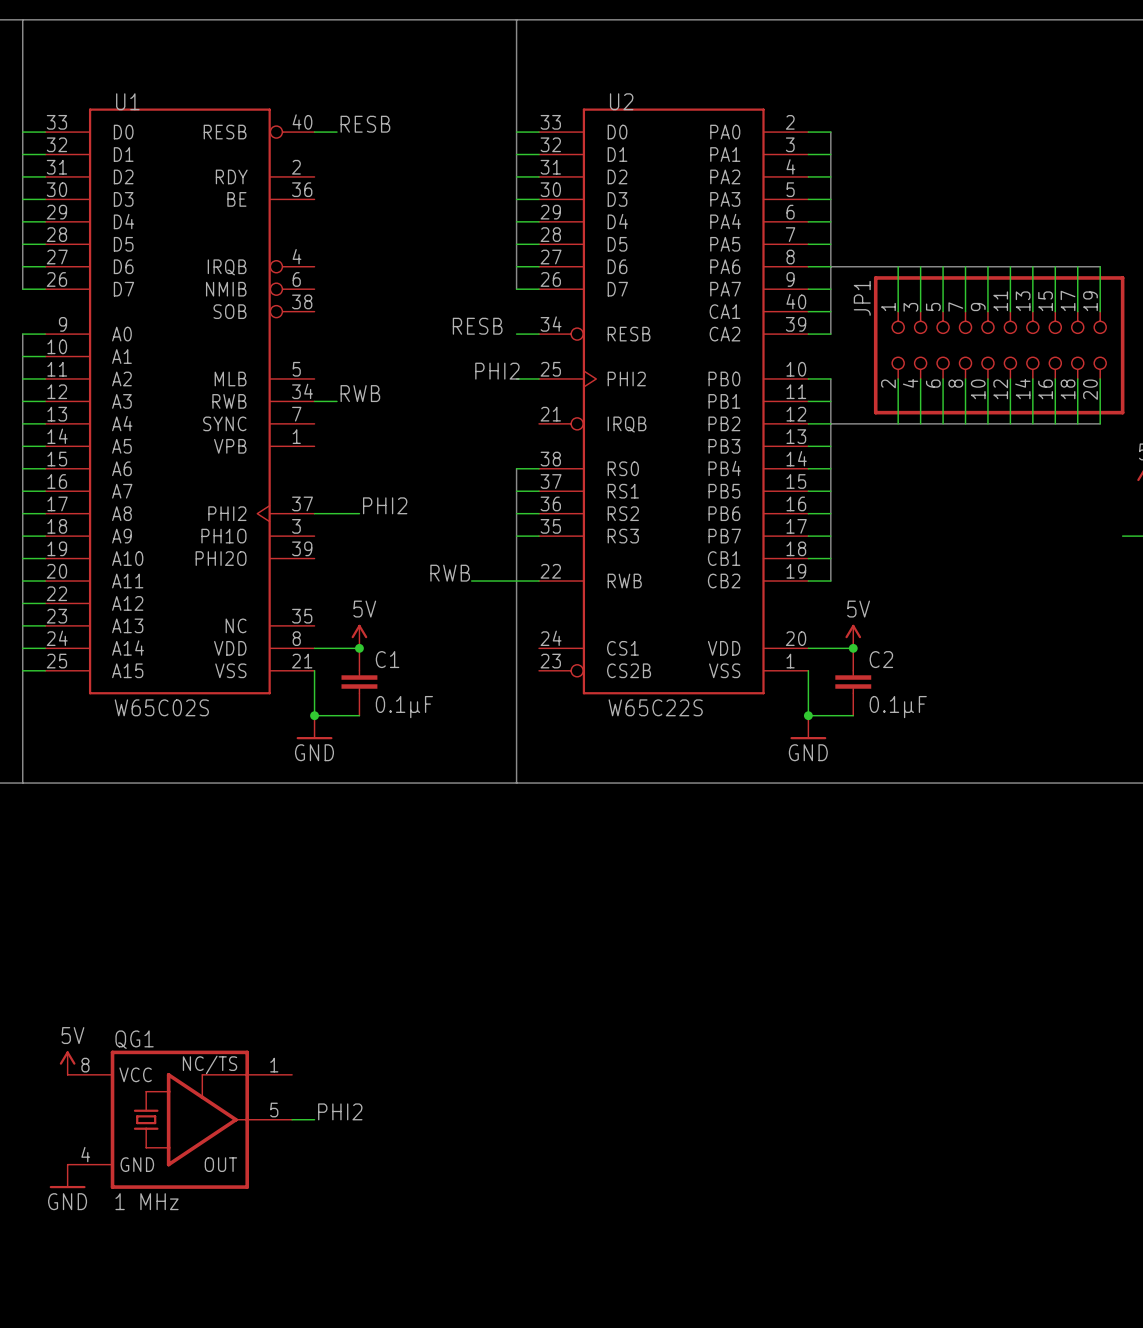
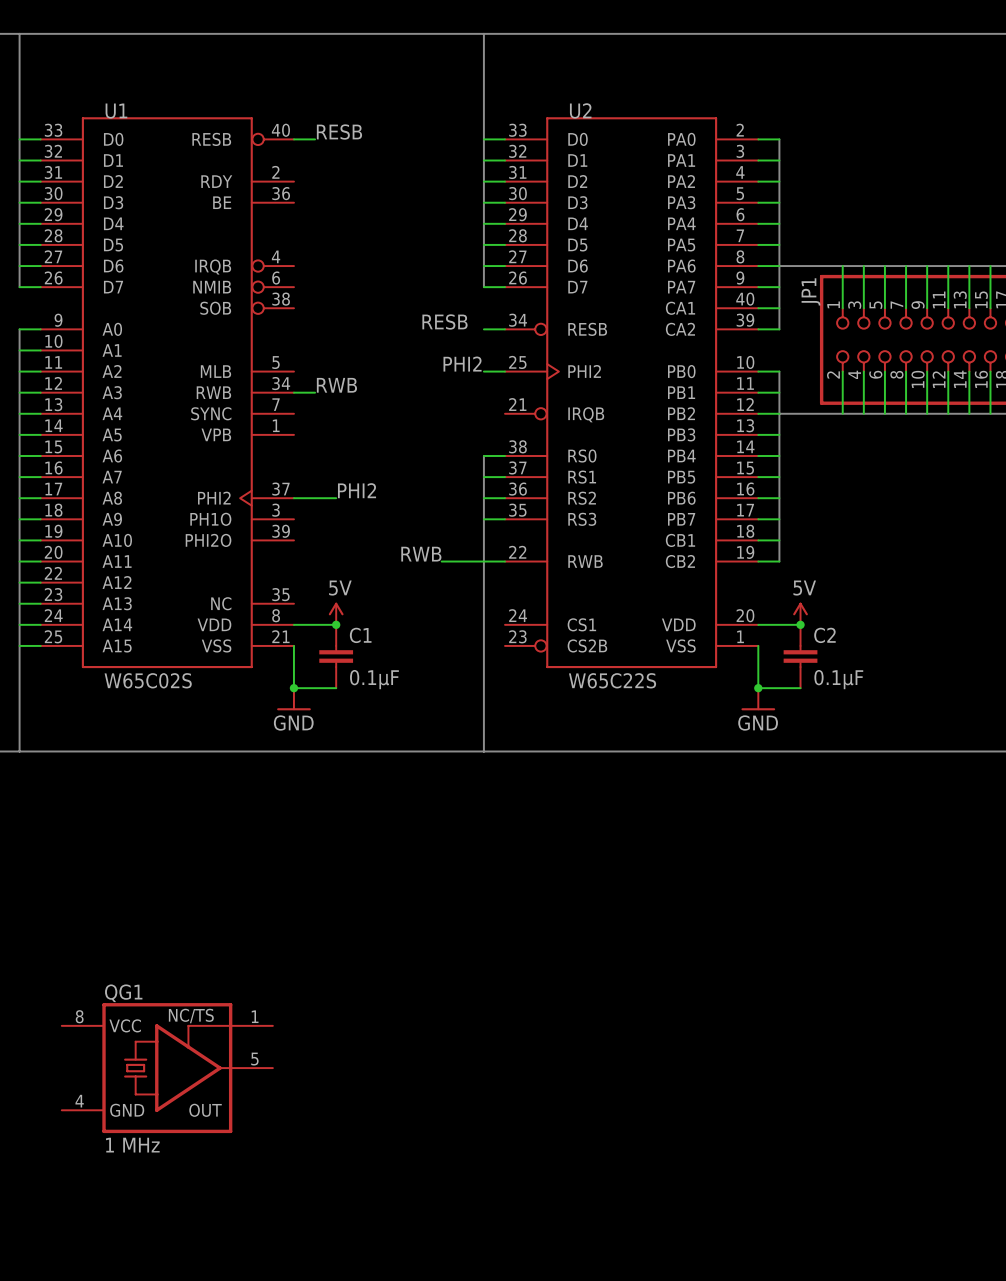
power symbol: 5V (67, 1063) -> none
label: PHI2 (340, 1111) -> none
wire: (292, 1119) (314, 1119) -> none
power symbol: GND (67, 1176) -> none

